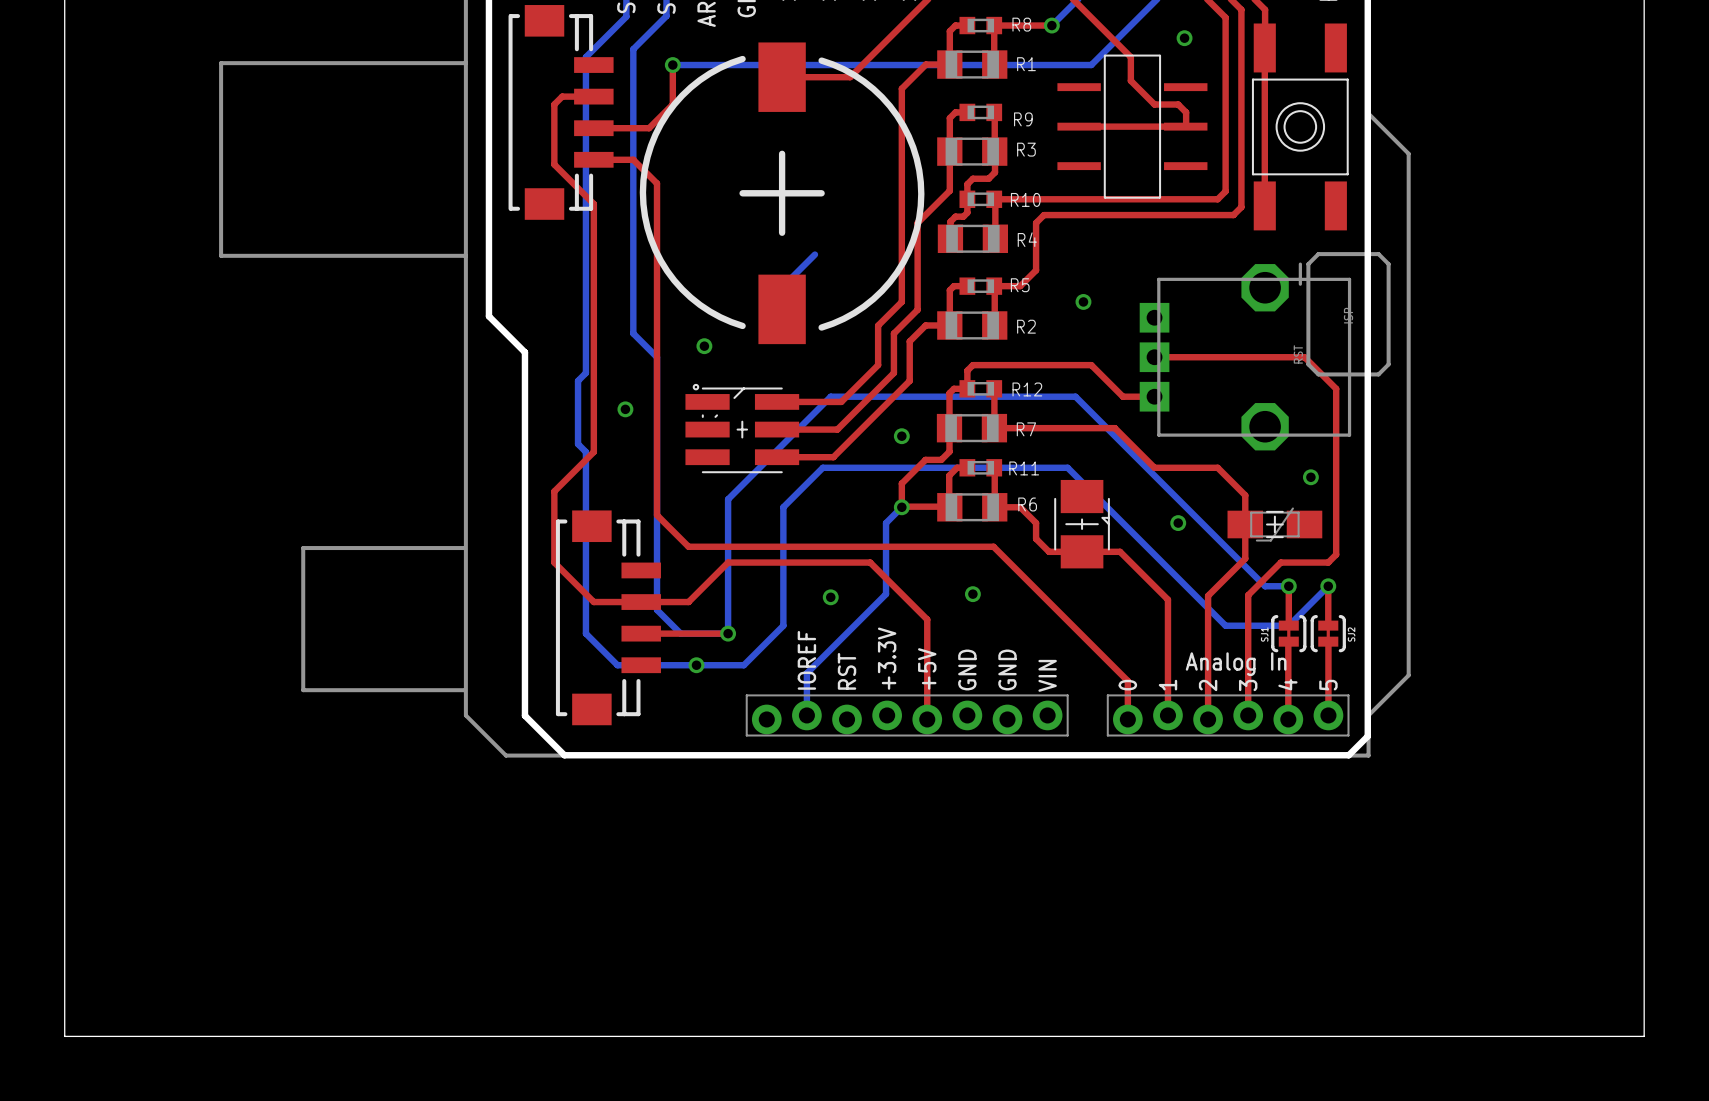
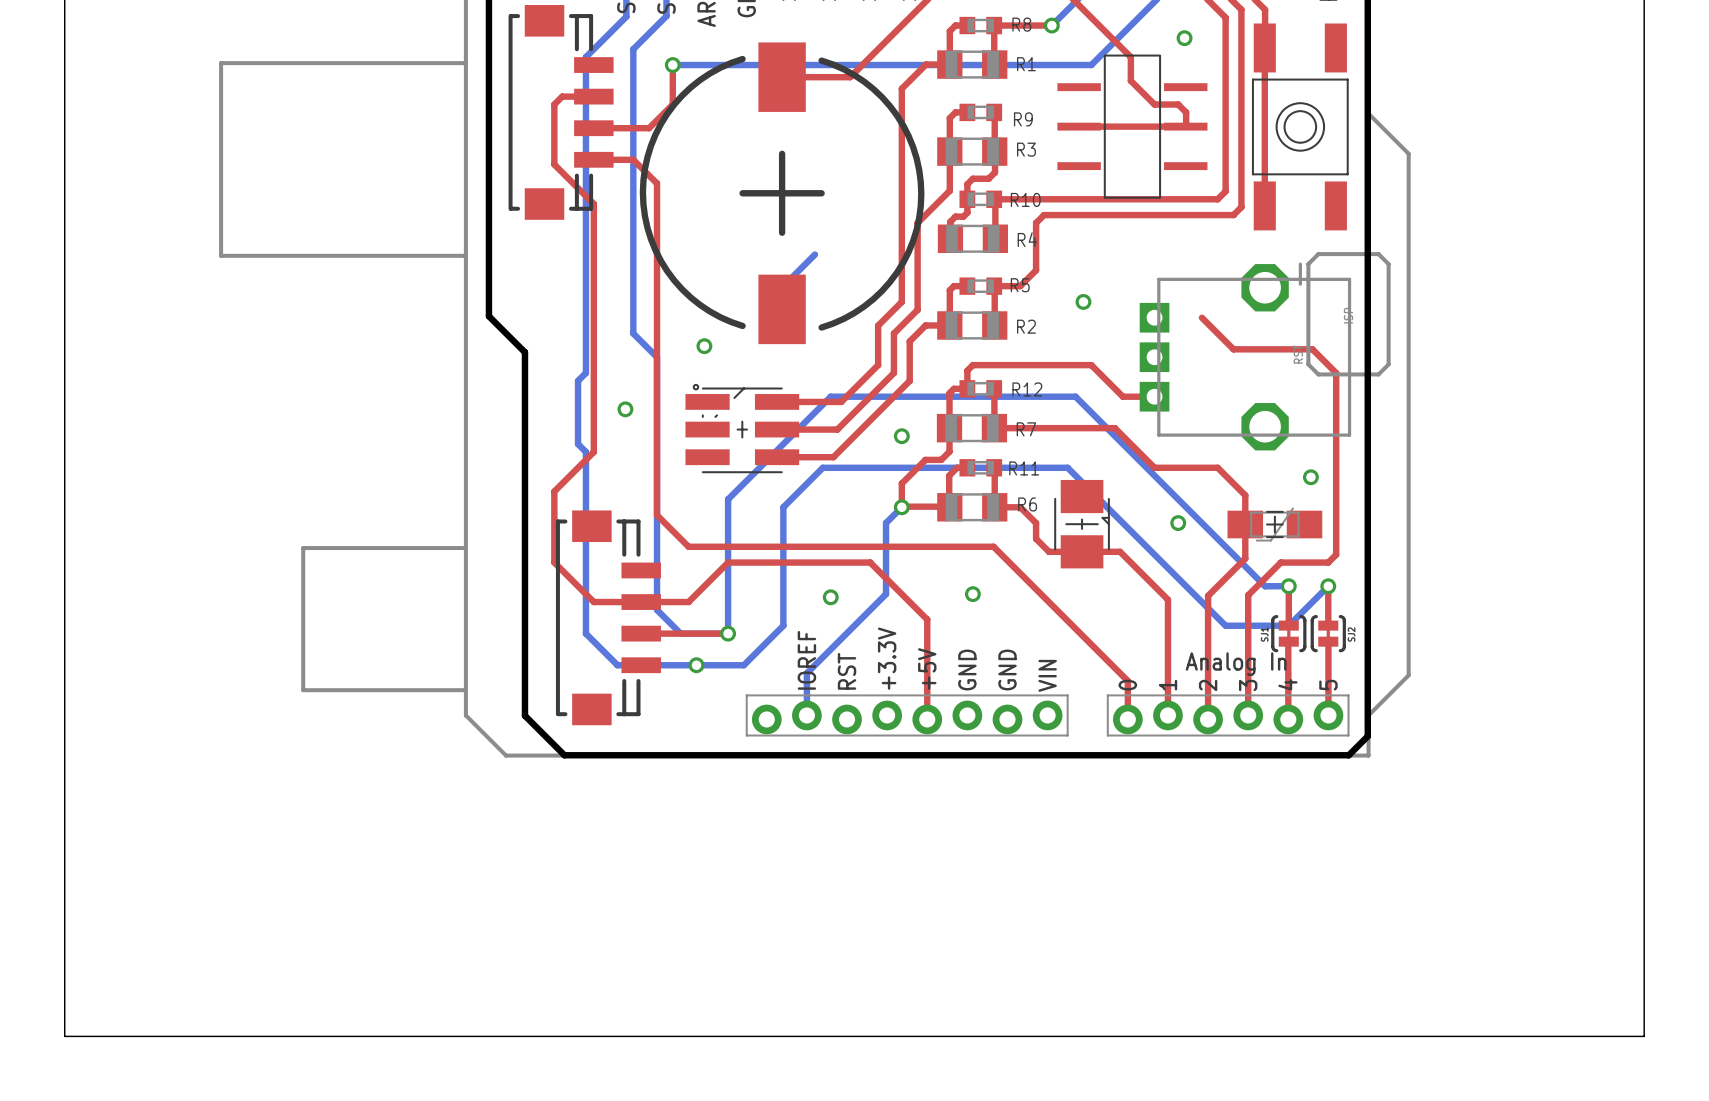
top track: (1154, 357) (1304, 357) (1336, 388) -> (1201, 317) (1233, 349) (1312, 349) (1336, 373) (1336, 388)

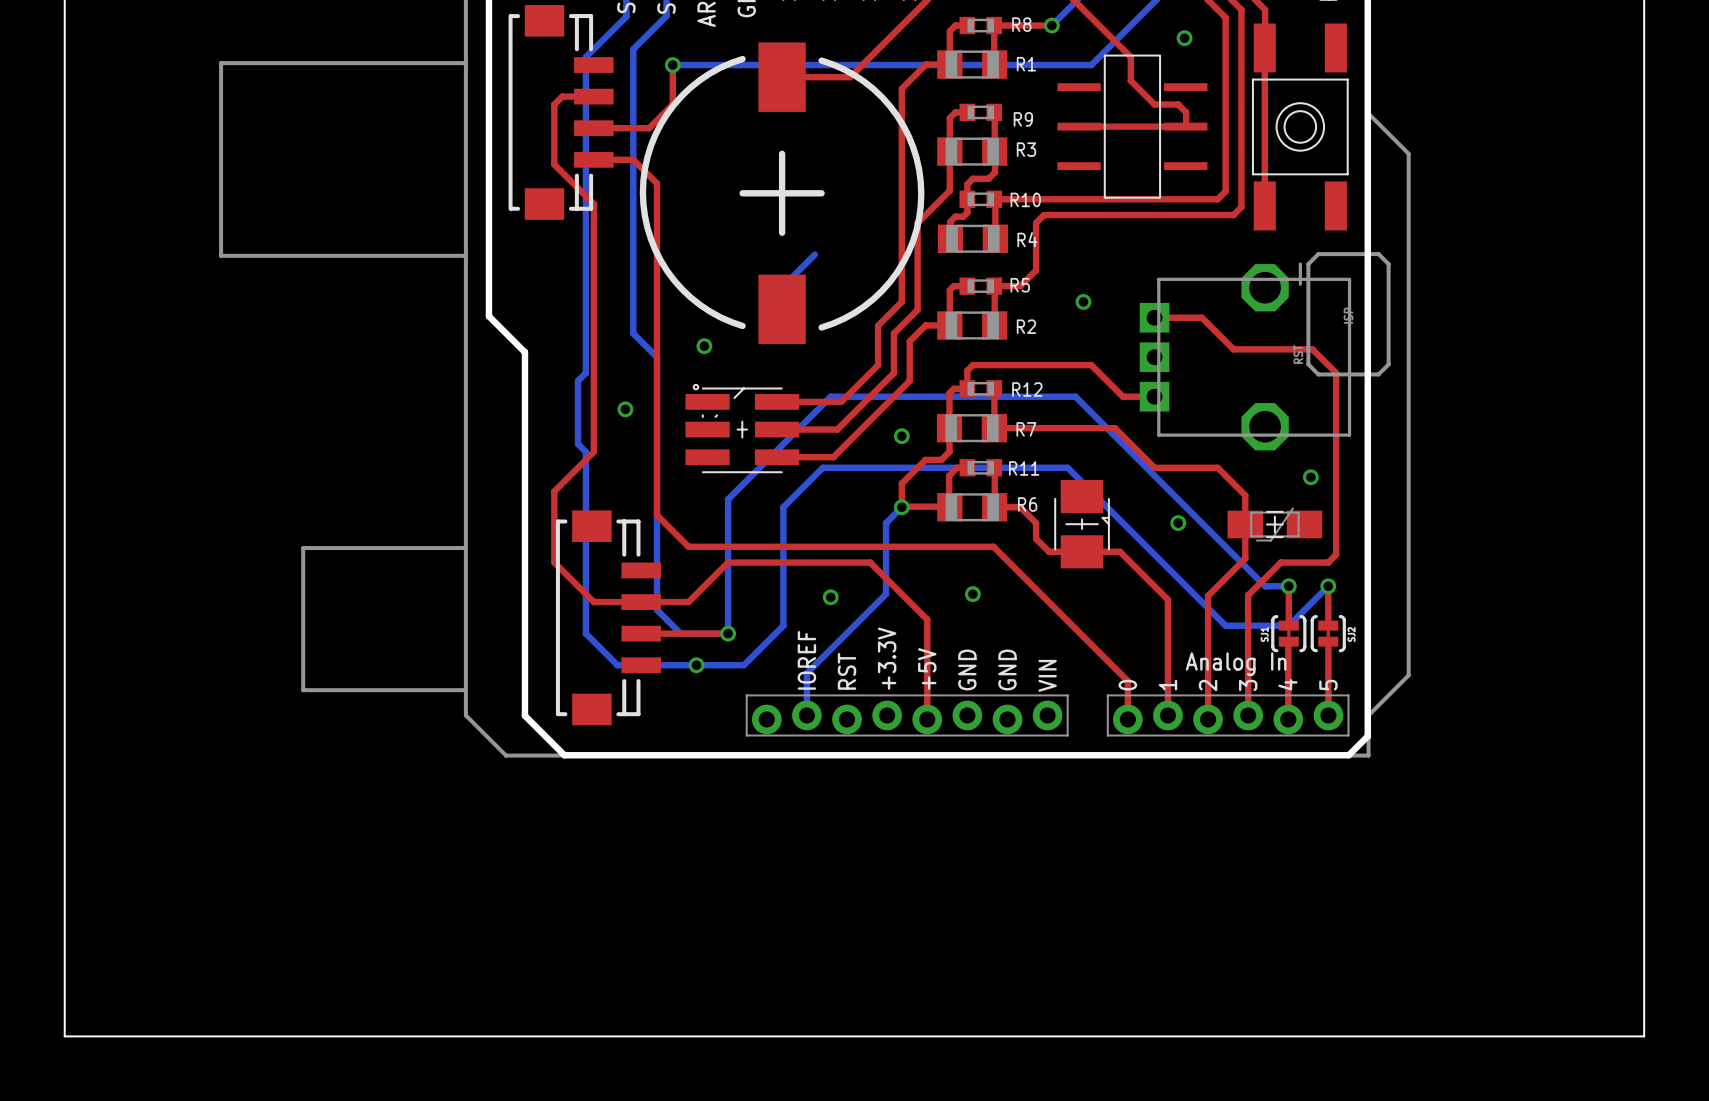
top track: none -> (1154, 317) (1201, 317)

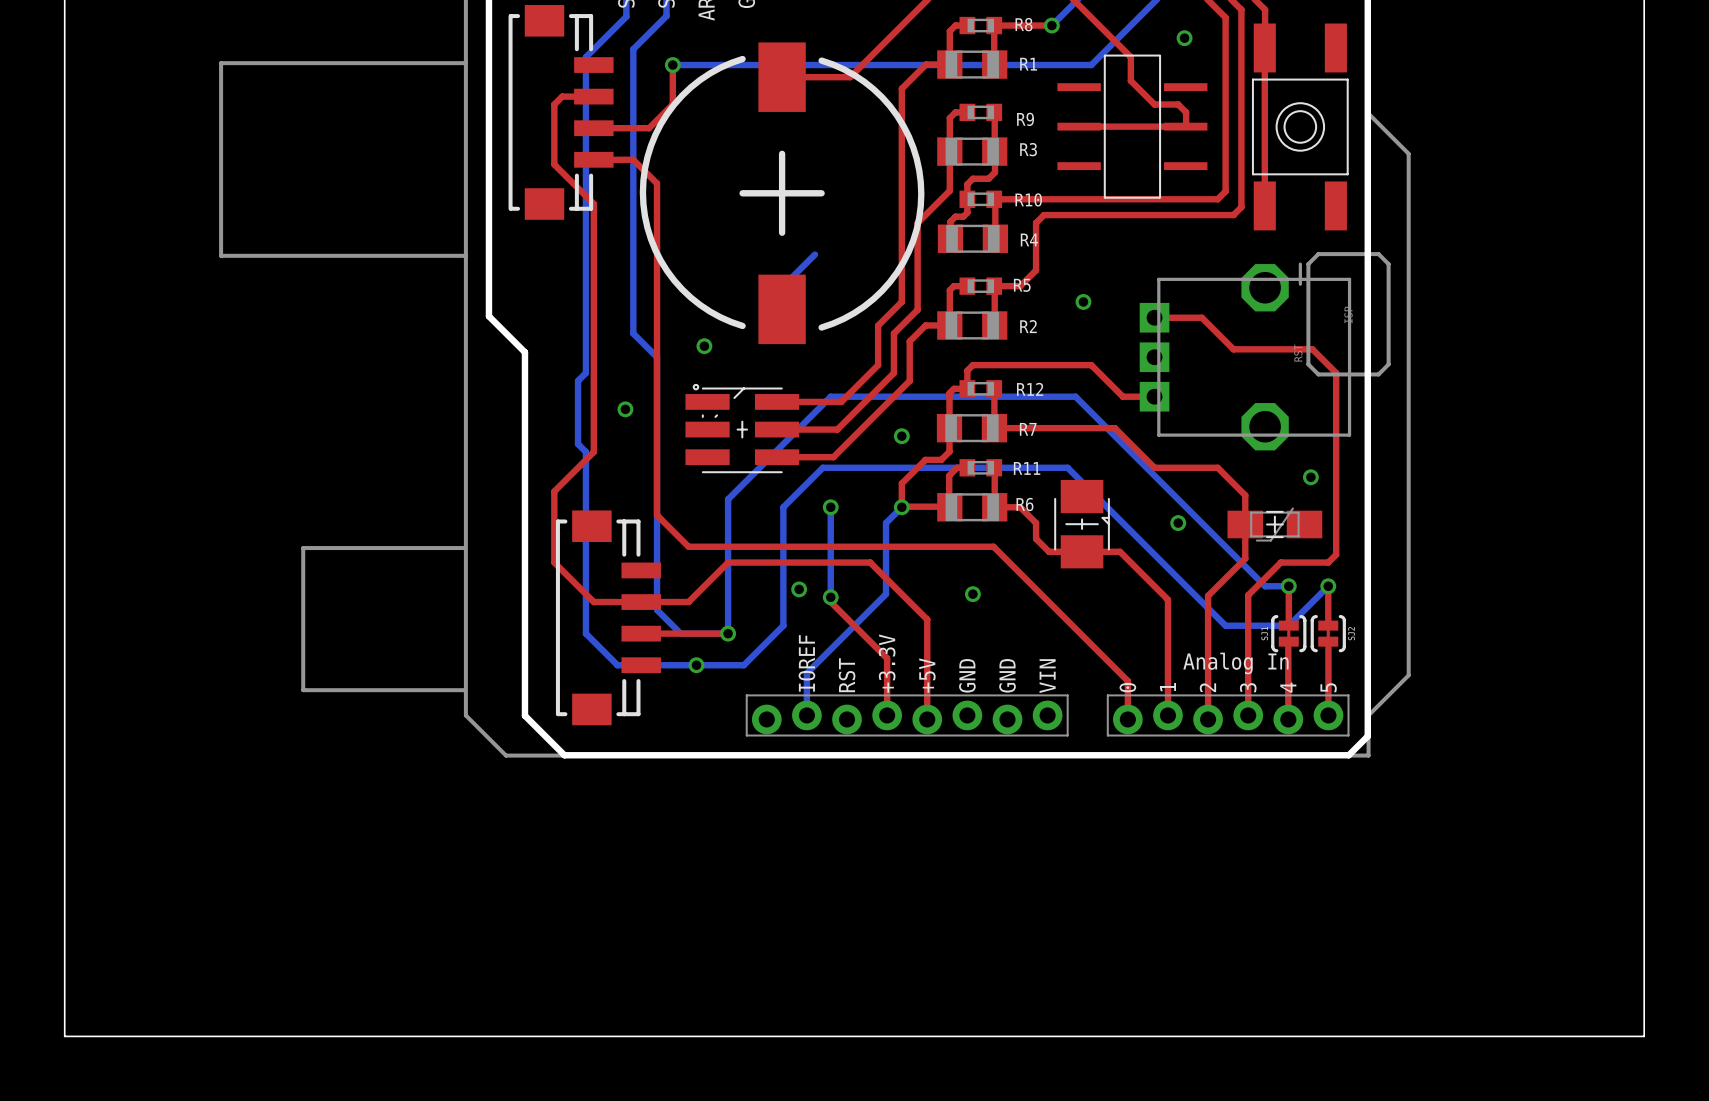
bottom track: none -> (830, 507) (830, 602)
via: none -> (830, 507)
via: none -> (799, 589)
top track: none -> (830, 602) (887, 658) (887, 715)

